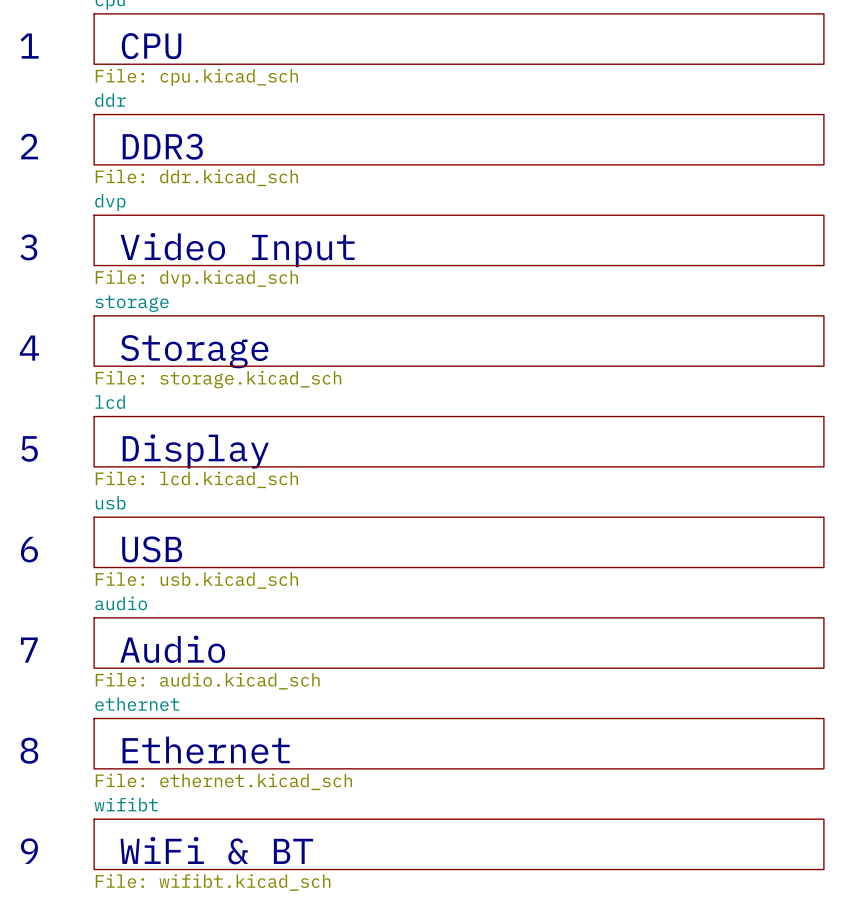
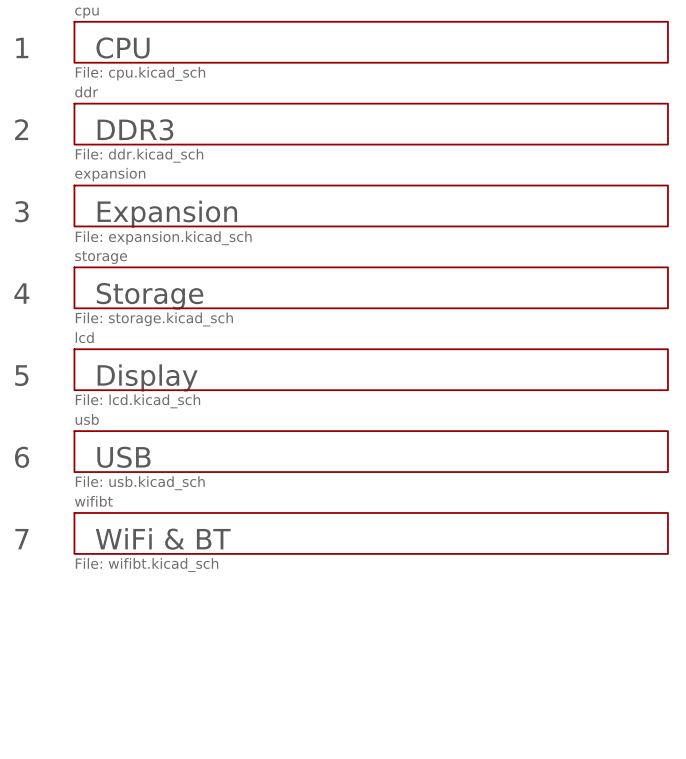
sheet dvp: File: dvp.kicad_sch (459, 240) -> none
sheet expansion: none -> File: expansion.kicad_sch (371, 205)
text: Video Input (237, 250) -> Expansion (167, 214)
sheet audio name: audio (121, 603) -> wifibt (93, 501)
text: Audio (172, 649) -> WiFi & BT (163, 538)
sheet audio value: File: audio.kicad_sch (207, 681) -> File: wifibt.kicad_sch (147, 565)
sheet ethernet: File: ethernet.kicad_sch (459, 743) -> none
text: 8 (29, 750) -> none
text: Ethernet (206, 750) -> none
sheet wifibt: File: wifibt.kicad_sch (459, 844) -> none
text: WiFi & BT (216, 850) -> none
text: 9 (29, 851) -> none

